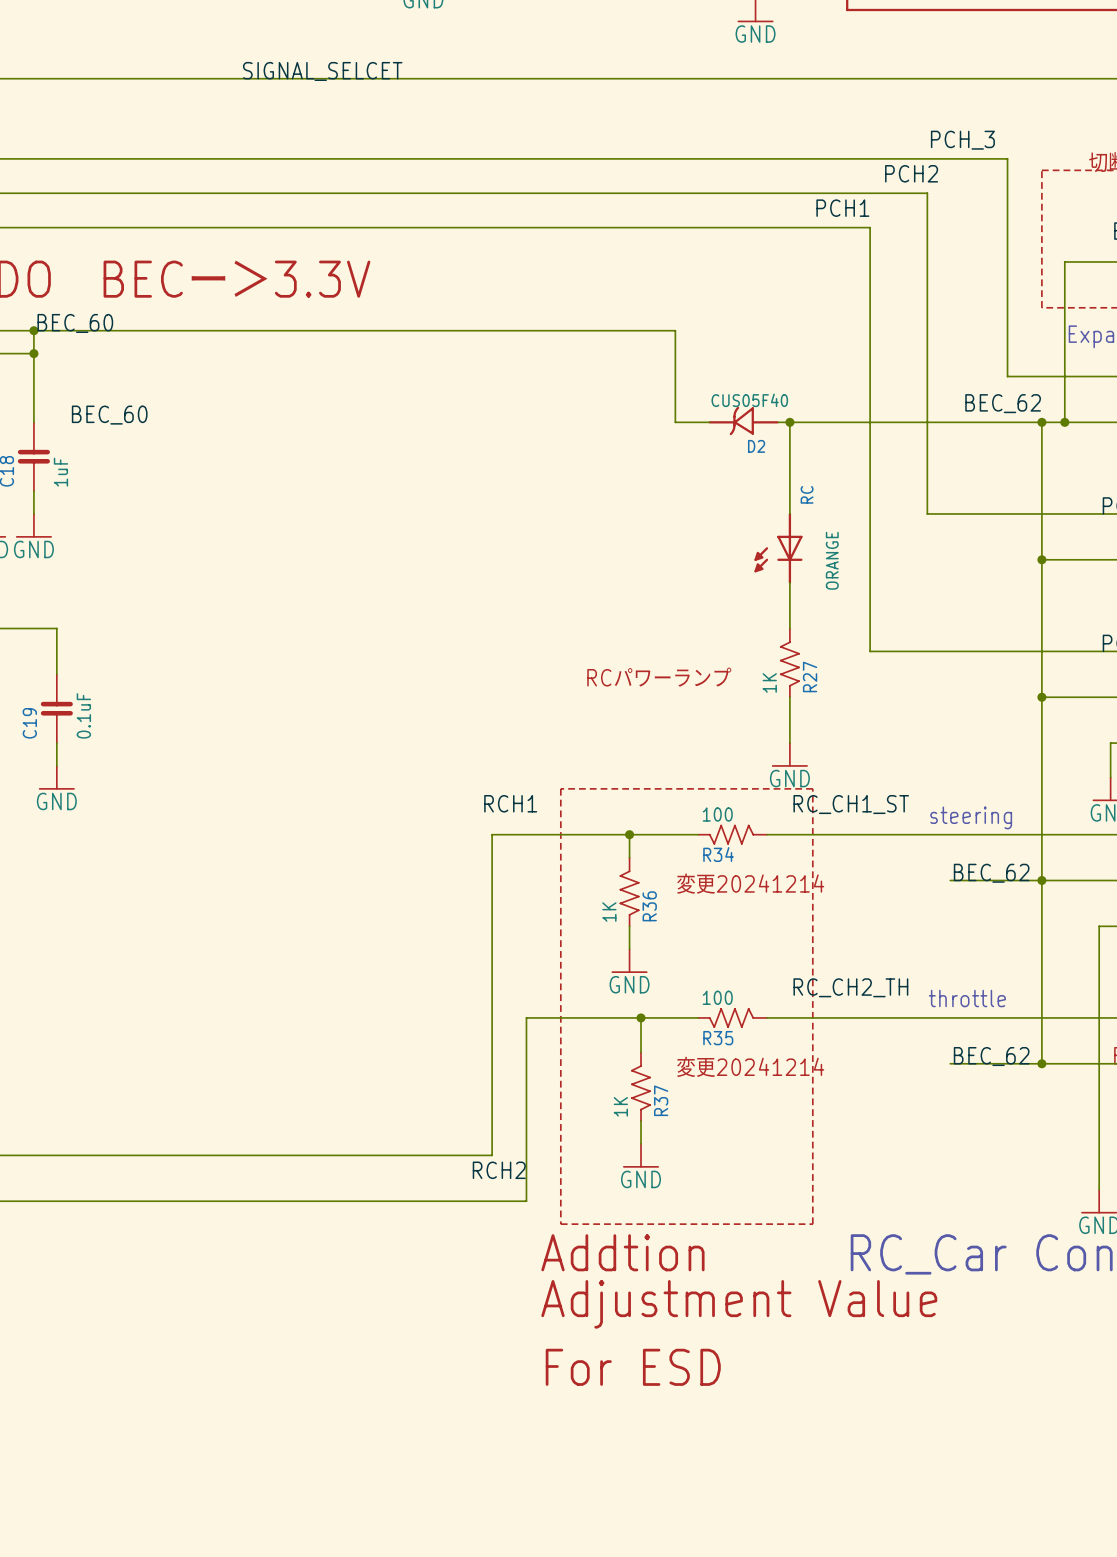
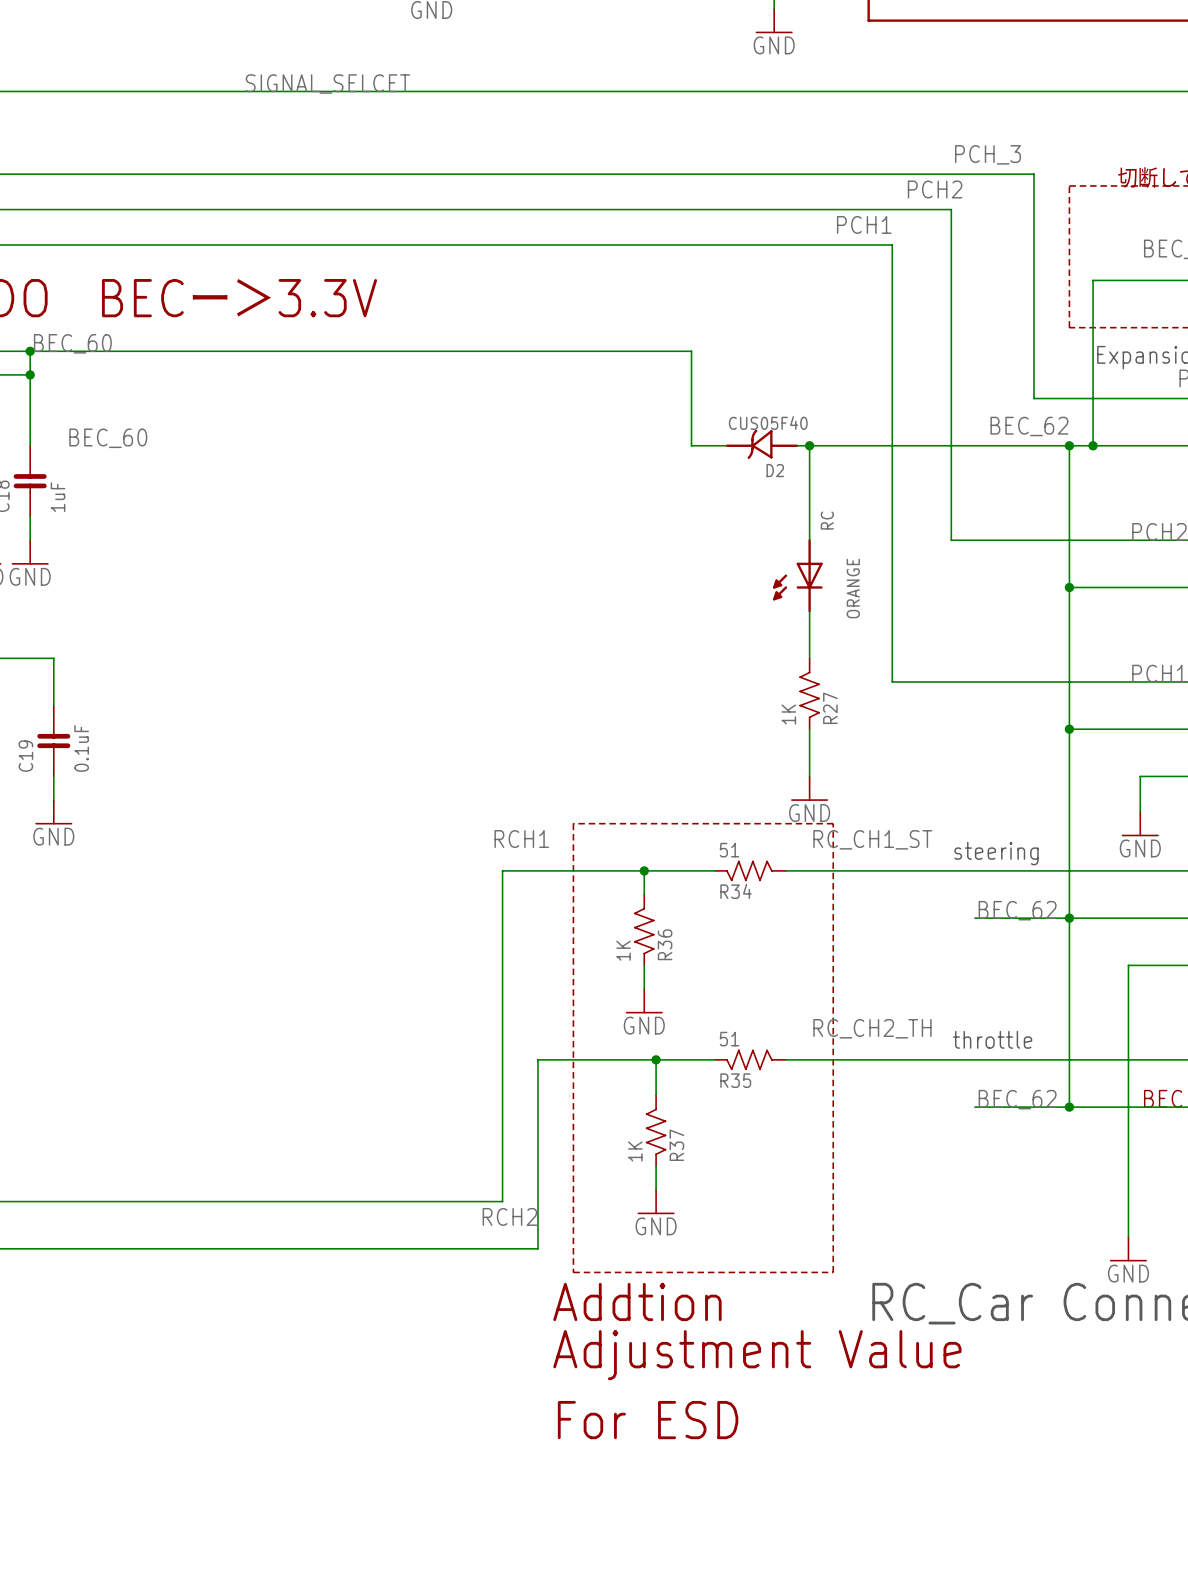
text: RCパワーランプ (659, 677) -> none
R34 value: 100 (717, 814) -> 51 (729, 850)
text: 変更20241214 (750, 883) -> none
R35 value: 100 (717, 997) -> 51 (729, 1039)
text: 変更20241214 (750, 1066) -> none

